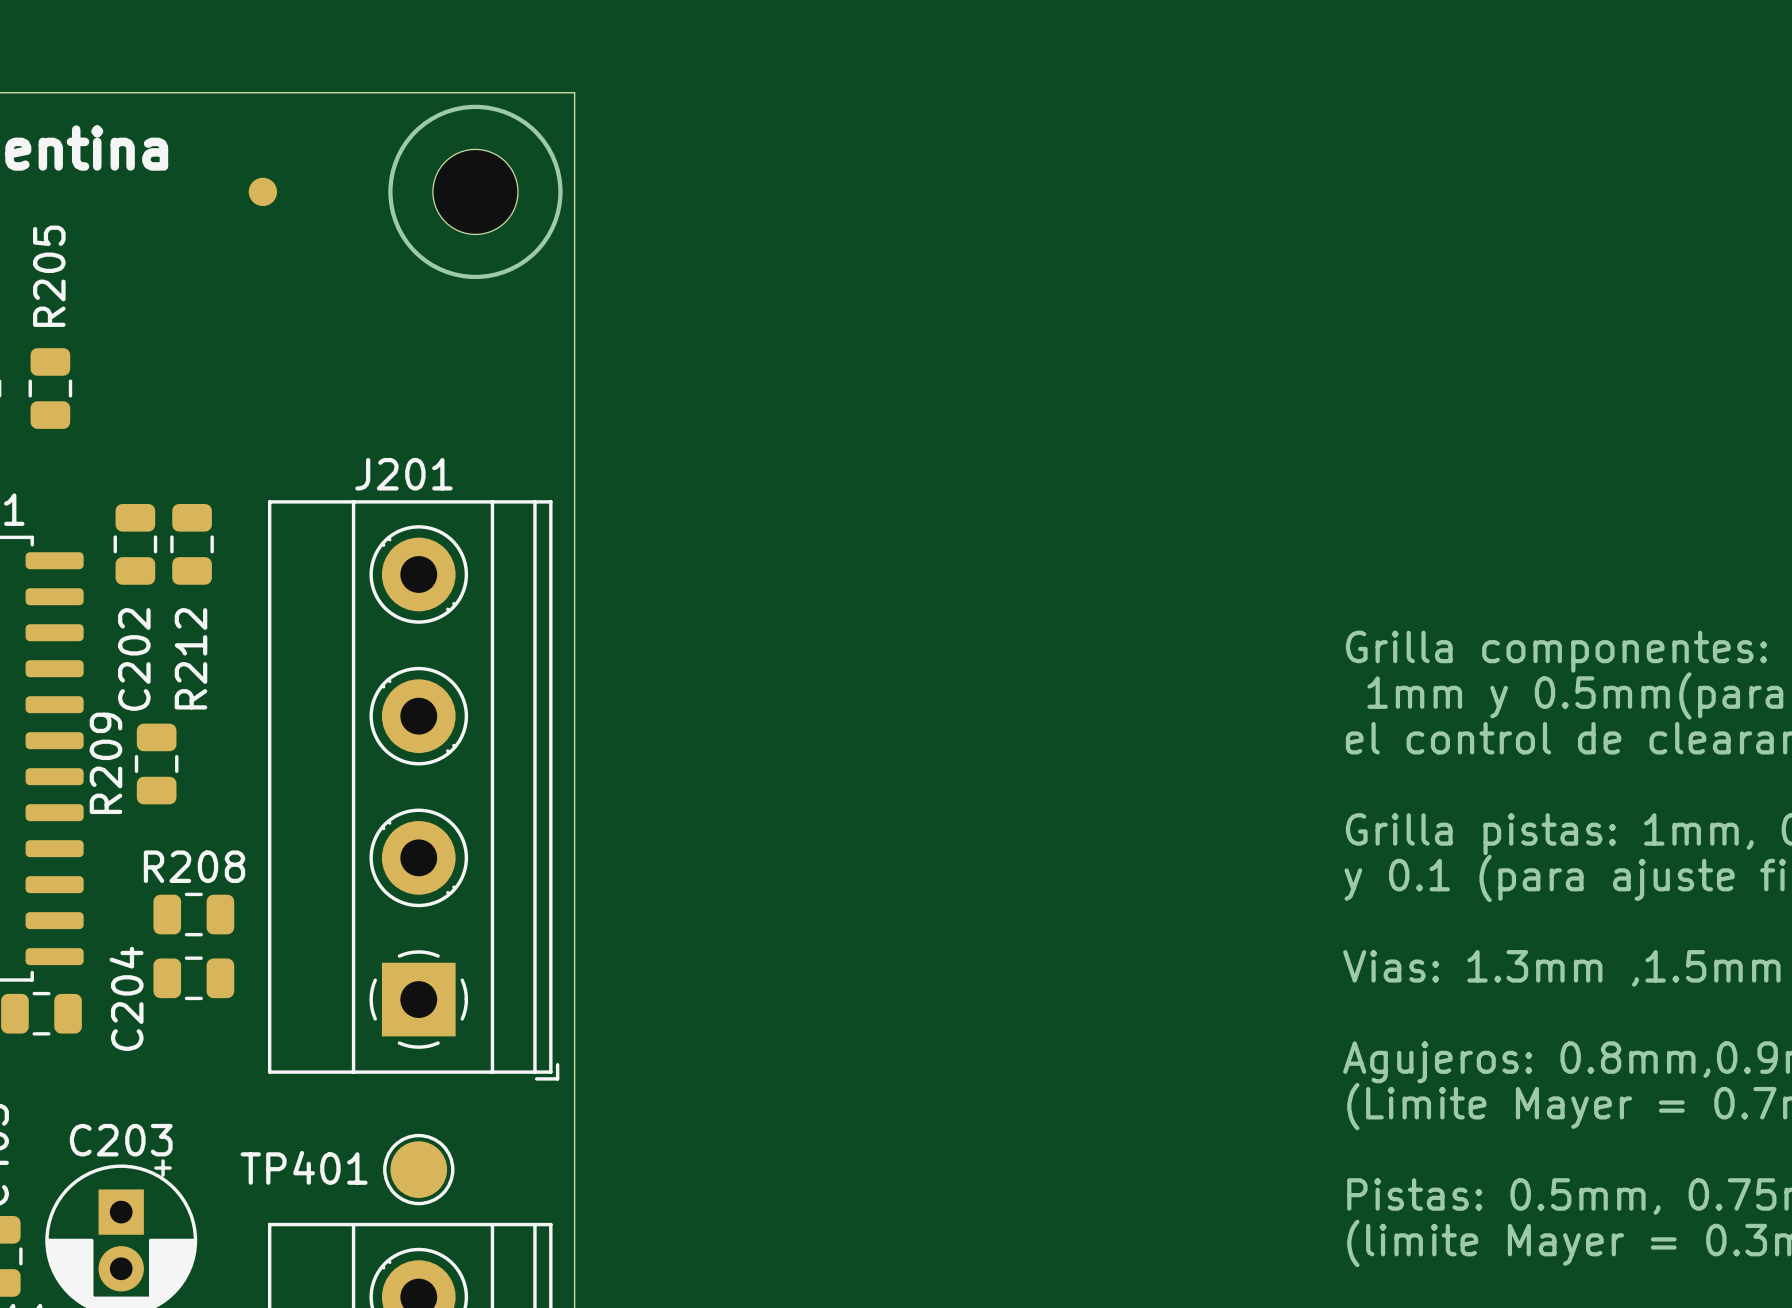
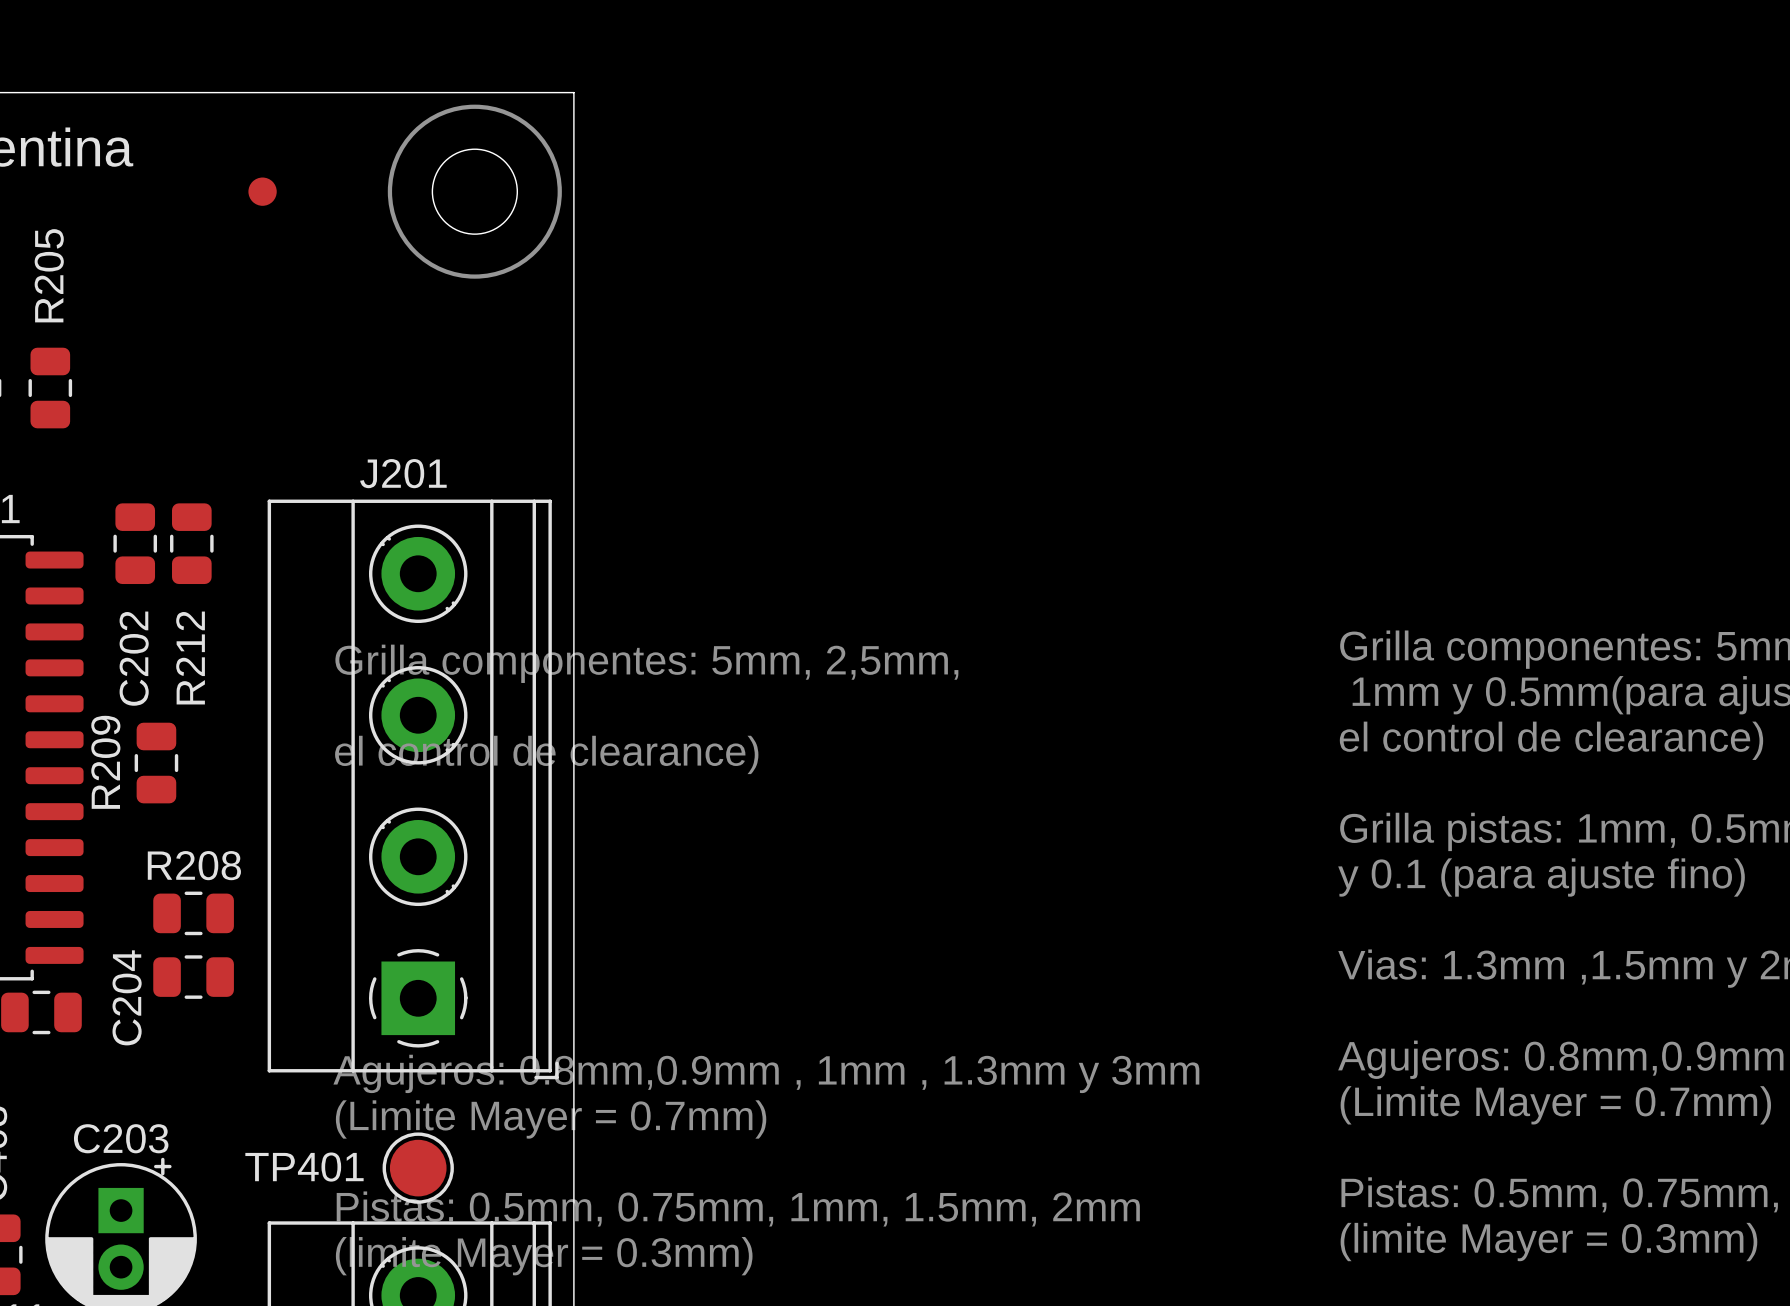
text: none -> Grilla componentes: 5mm, 2,5mm, (646, 663)
text: none -> el control de clearance) (546, 754)
text: none -> Agujeros: 0.8mm,0.9mm , 1mm , 1.3mm y 3mm (766, 1073)
text: none -> (Limite Mayer = 0.7mm) (551, 1119)
text: none -> Pistas: 0.5mm, 0.75mm, 1mm, 1.5mm, 2mm (738, 1208)
text: none -> (limite Mayer = 0.3mm) (544, 1256)

